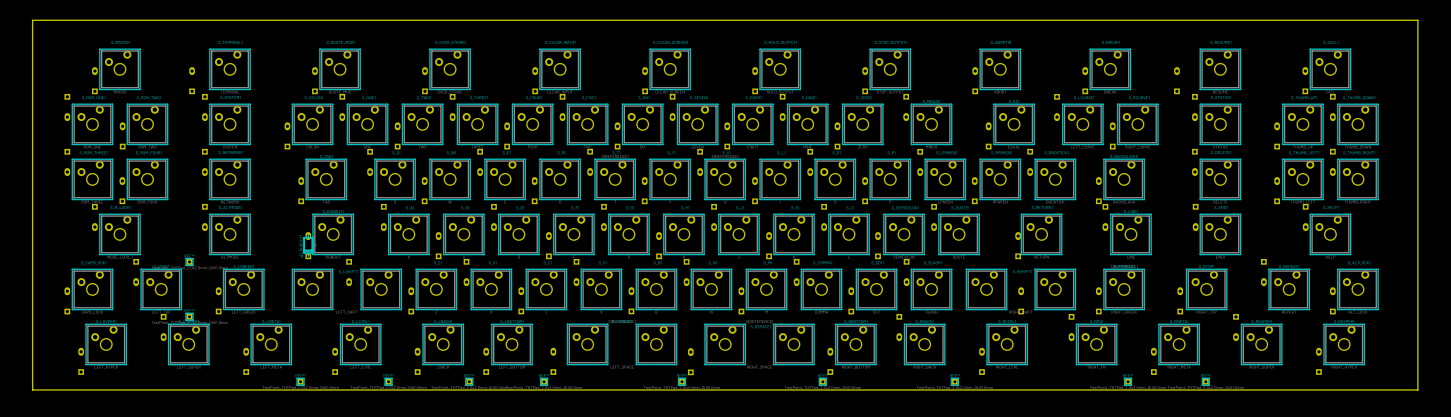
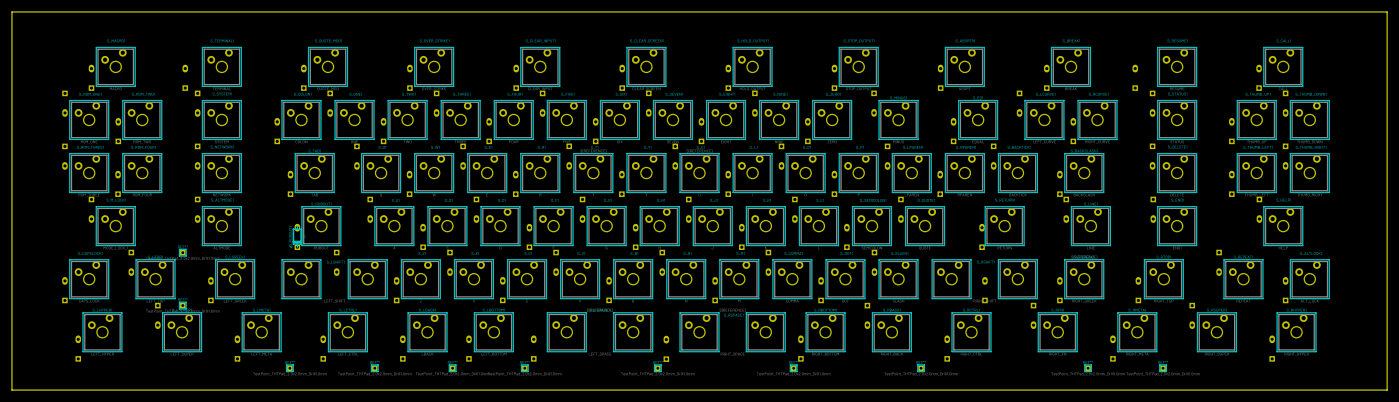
board edge: (32, 20) (1417, 20) (1417, 389) (32, 389) (32, 20) -> (11, 11) (11, 390) (1387, 390) (1387, 11) (11, 11)

